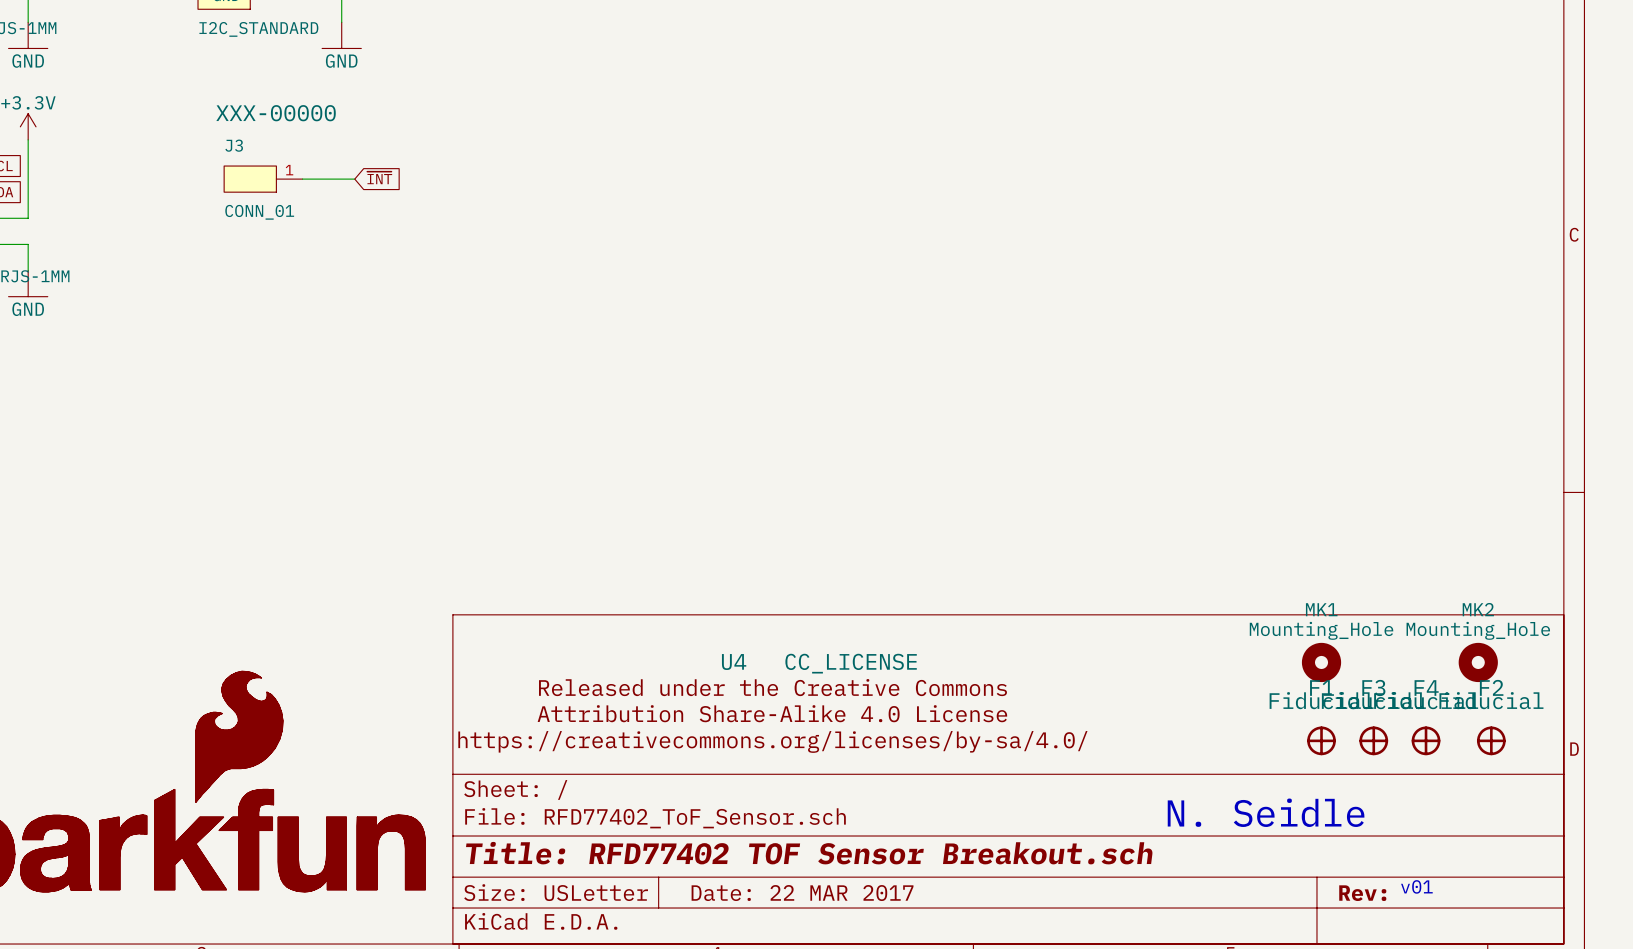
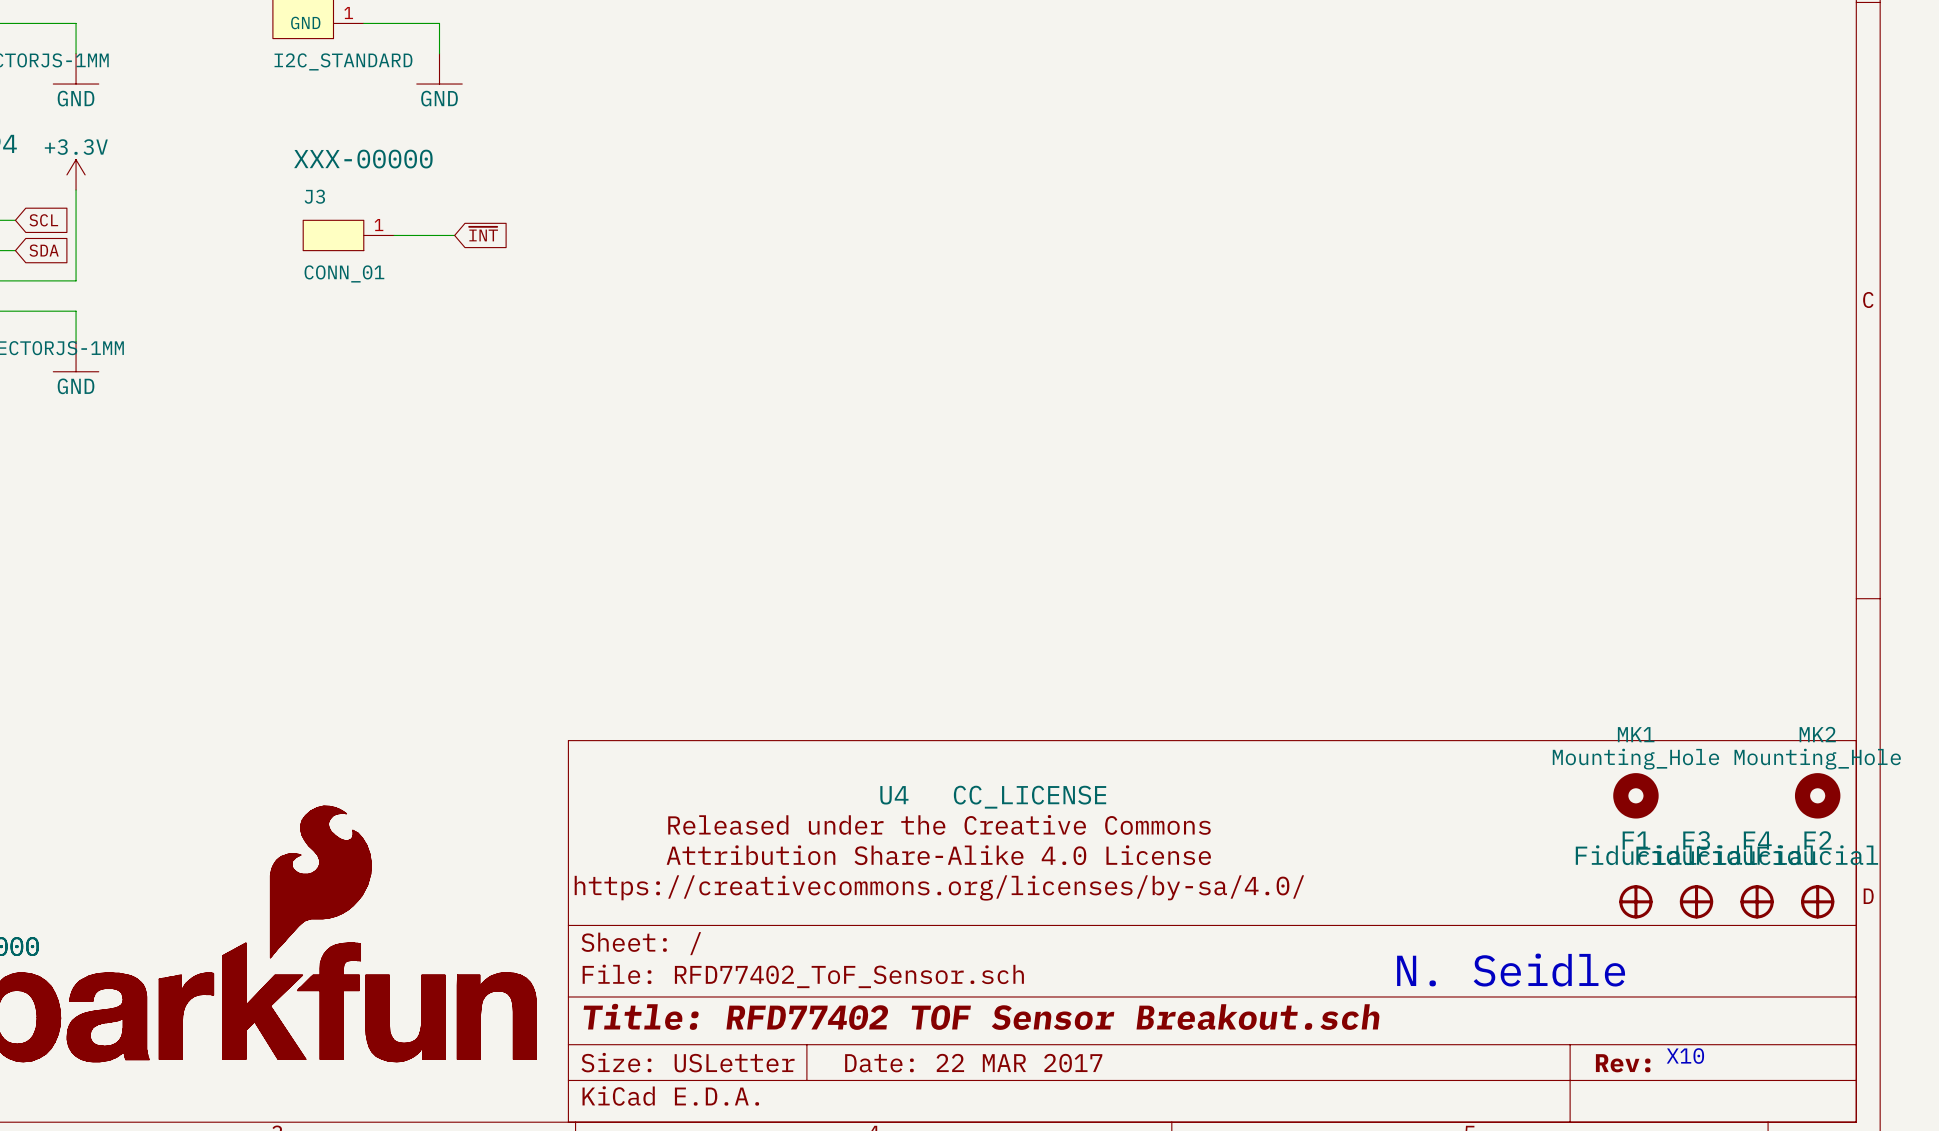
MK1 position: (1321, 662) -> (1635, 795)
MK2 position: (1478, 662) -> (1817, 795)
F1 position: (1321, 740) -> (1635, 901)
F3 position: (1373, 740) -> (1696, 901)
F4 position: (1426, 740) -> (1757, 901)
F2 position: (1491, 740) -> (1817, 901)
text: v01 (1416, 886) -> X10 (1685, 1056)

